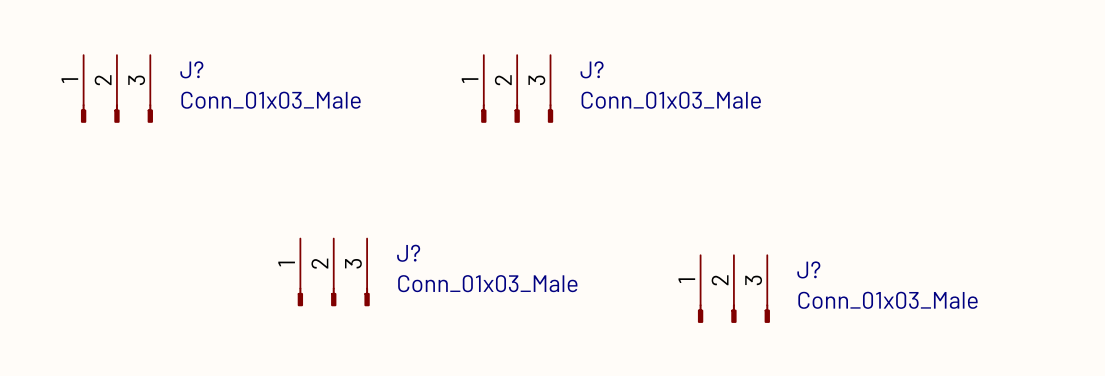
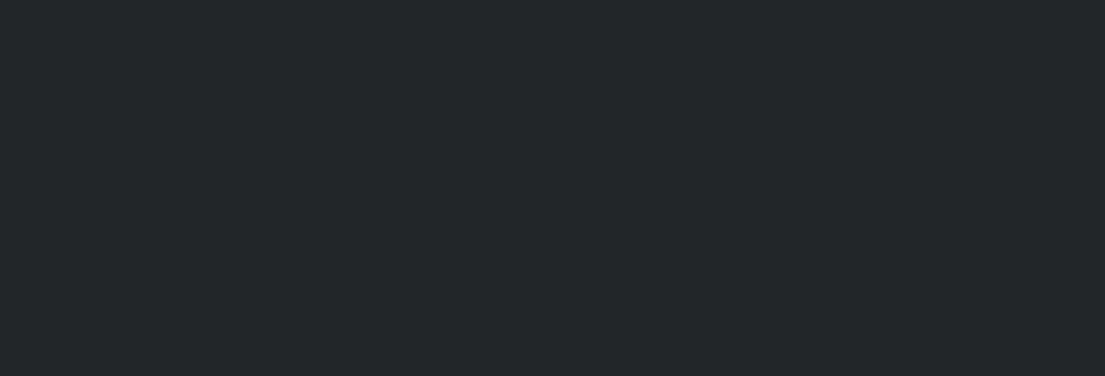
J?: Conn_01x03_Male (116, 88) -> none
J?: Conn_01x03_Male (517, 88) -> none
J?: Conn_01x03_Male (333, 272) -> none
J?: Conn_01x03_Male (733, 289) -> none

